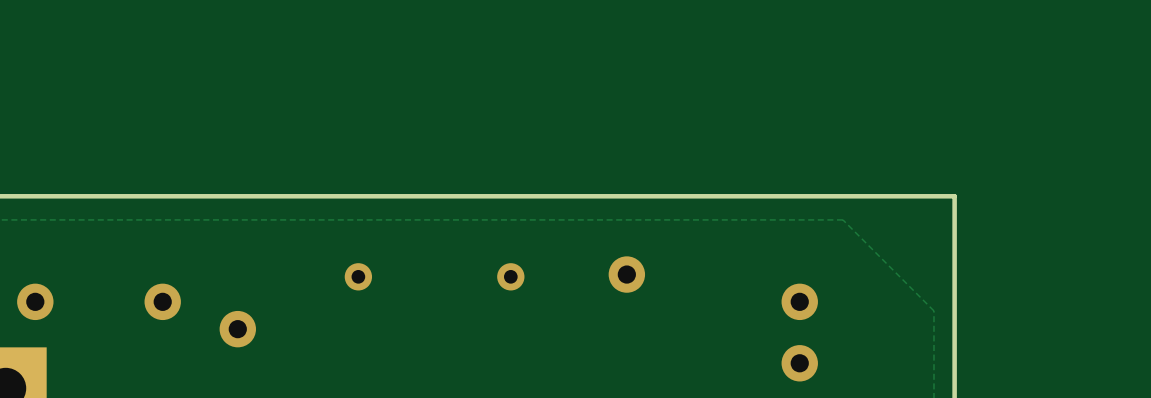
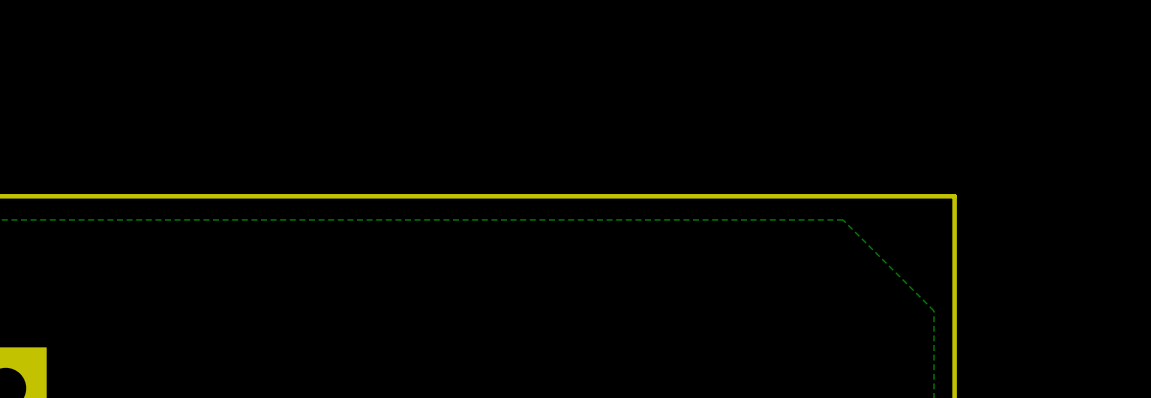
via: (626, 274) -> none
via: (358, 276) -> none
via: (510, 276) -> none
via: (35, 301) -> none
via: (162, 301) -> none
via: (799, 301) -> none
via: (237, 329) -> none
via: (799, 363) -> none

